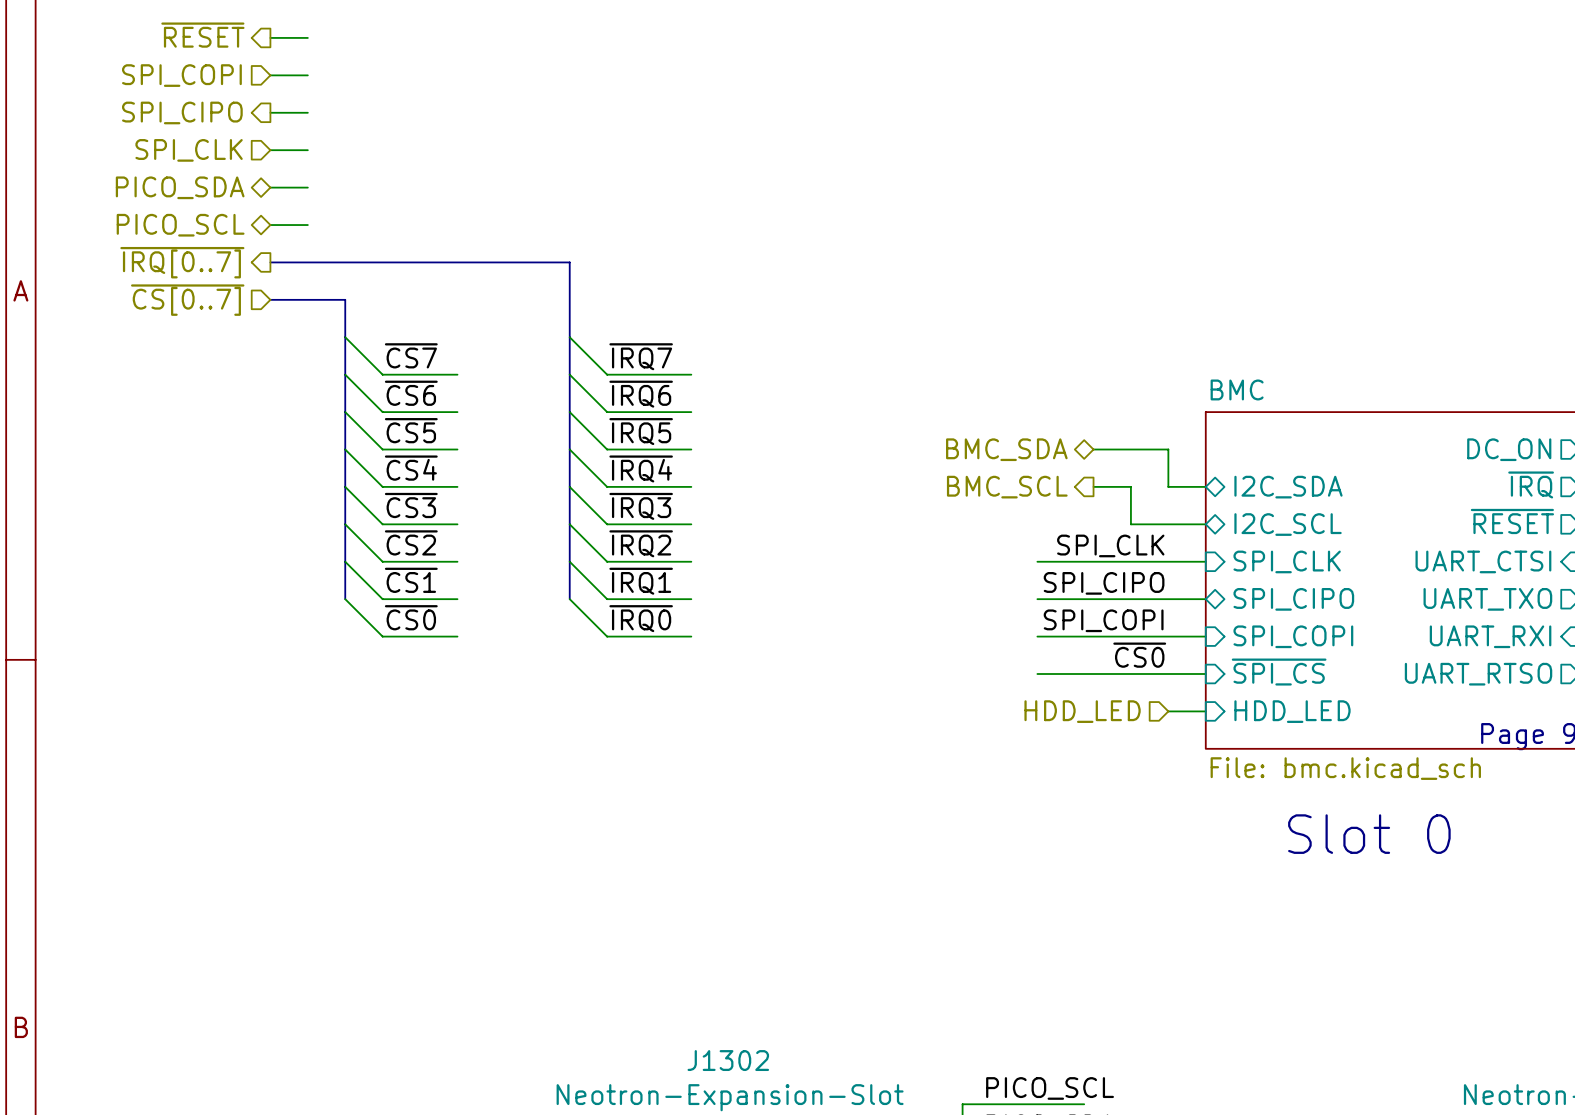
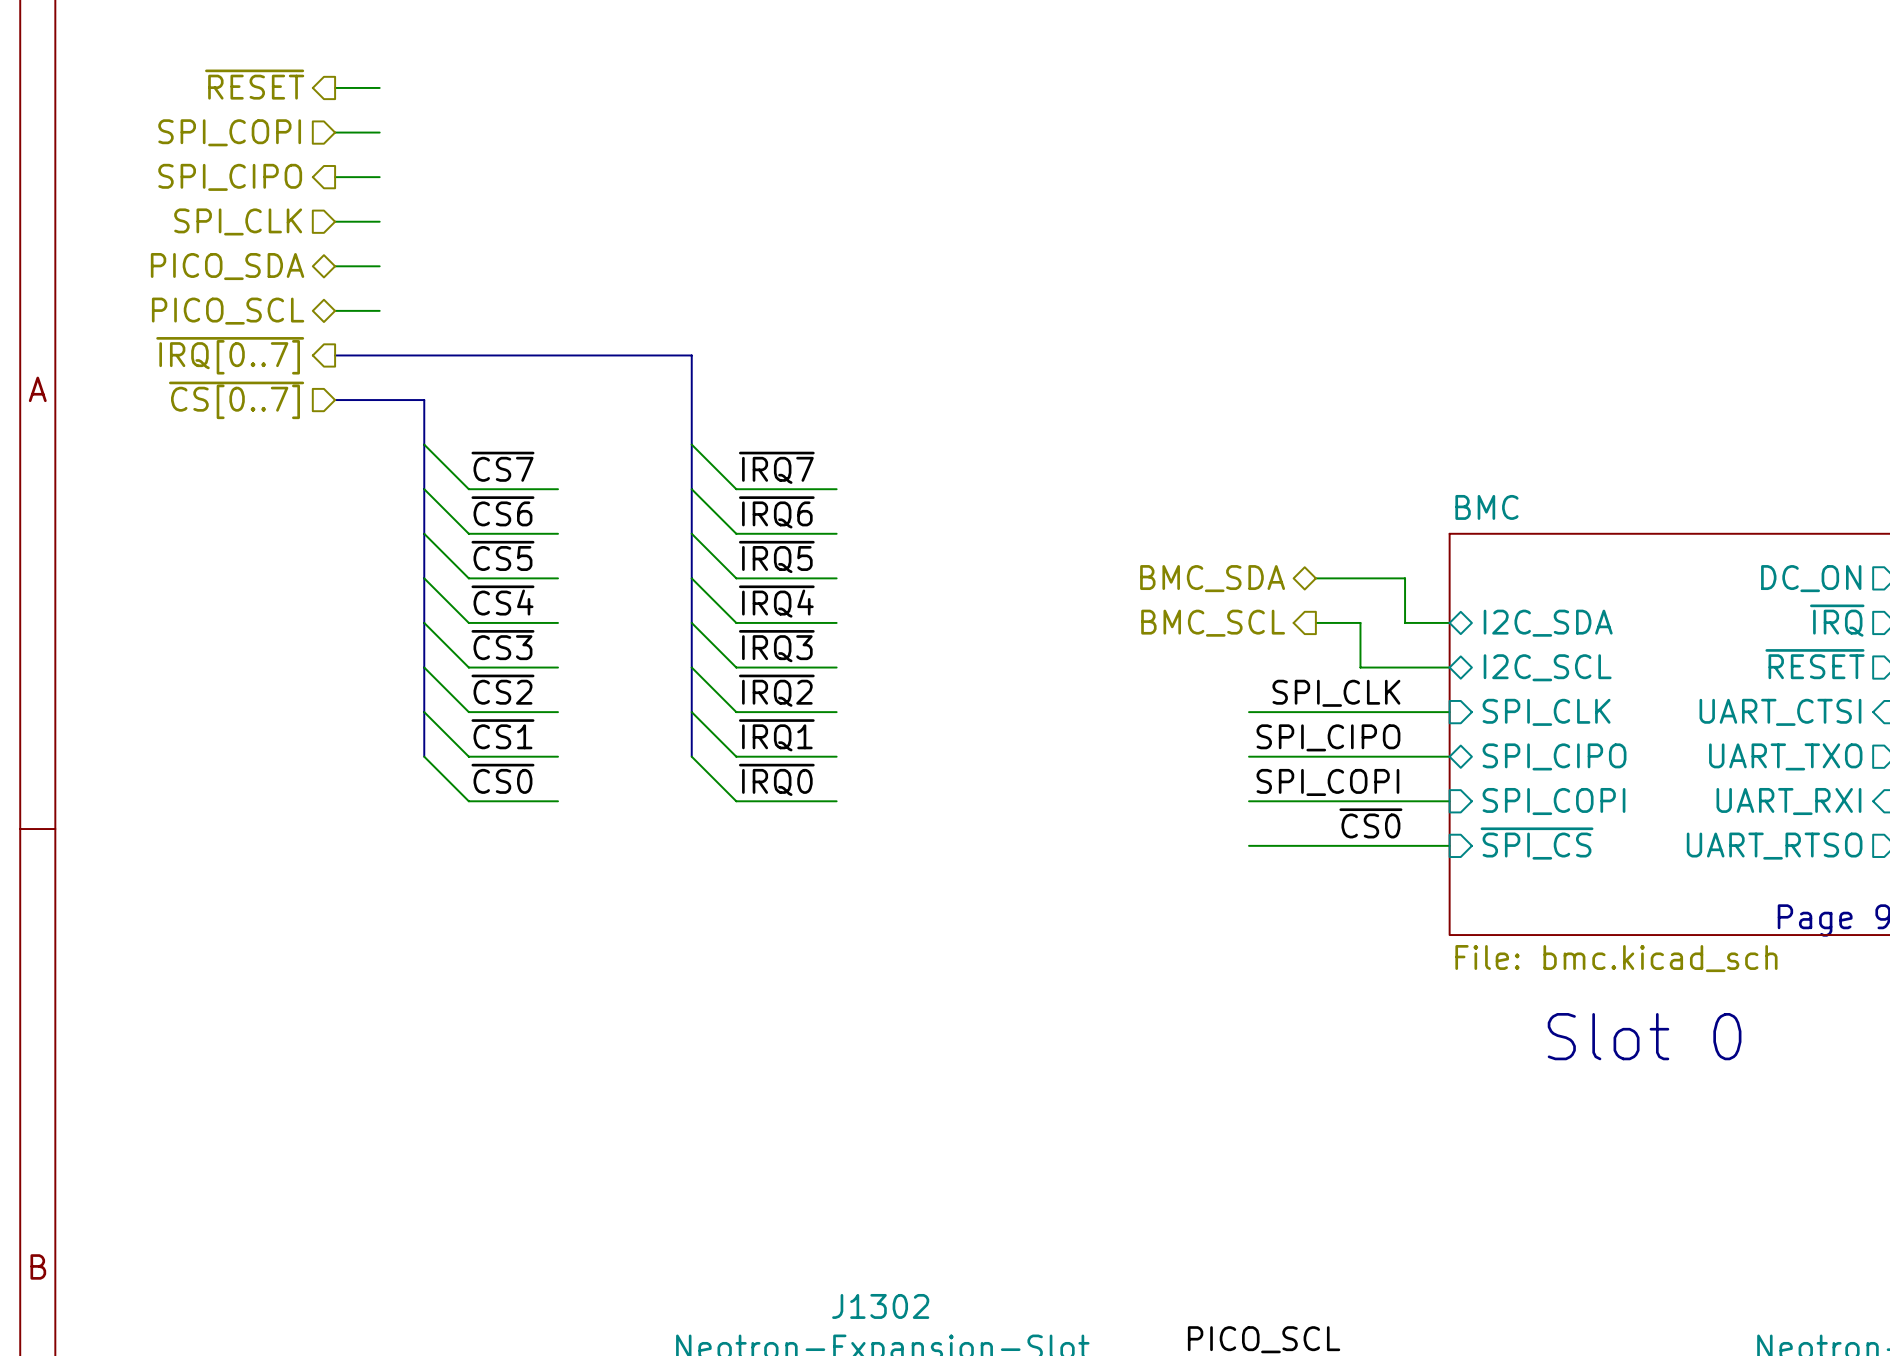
hierarchical label: HDD_LED (1082, 711) -> none
wire: (1168, 711) (1205, 711) -> none
sheet pin: HDD_LED (1292, 711) -> none

